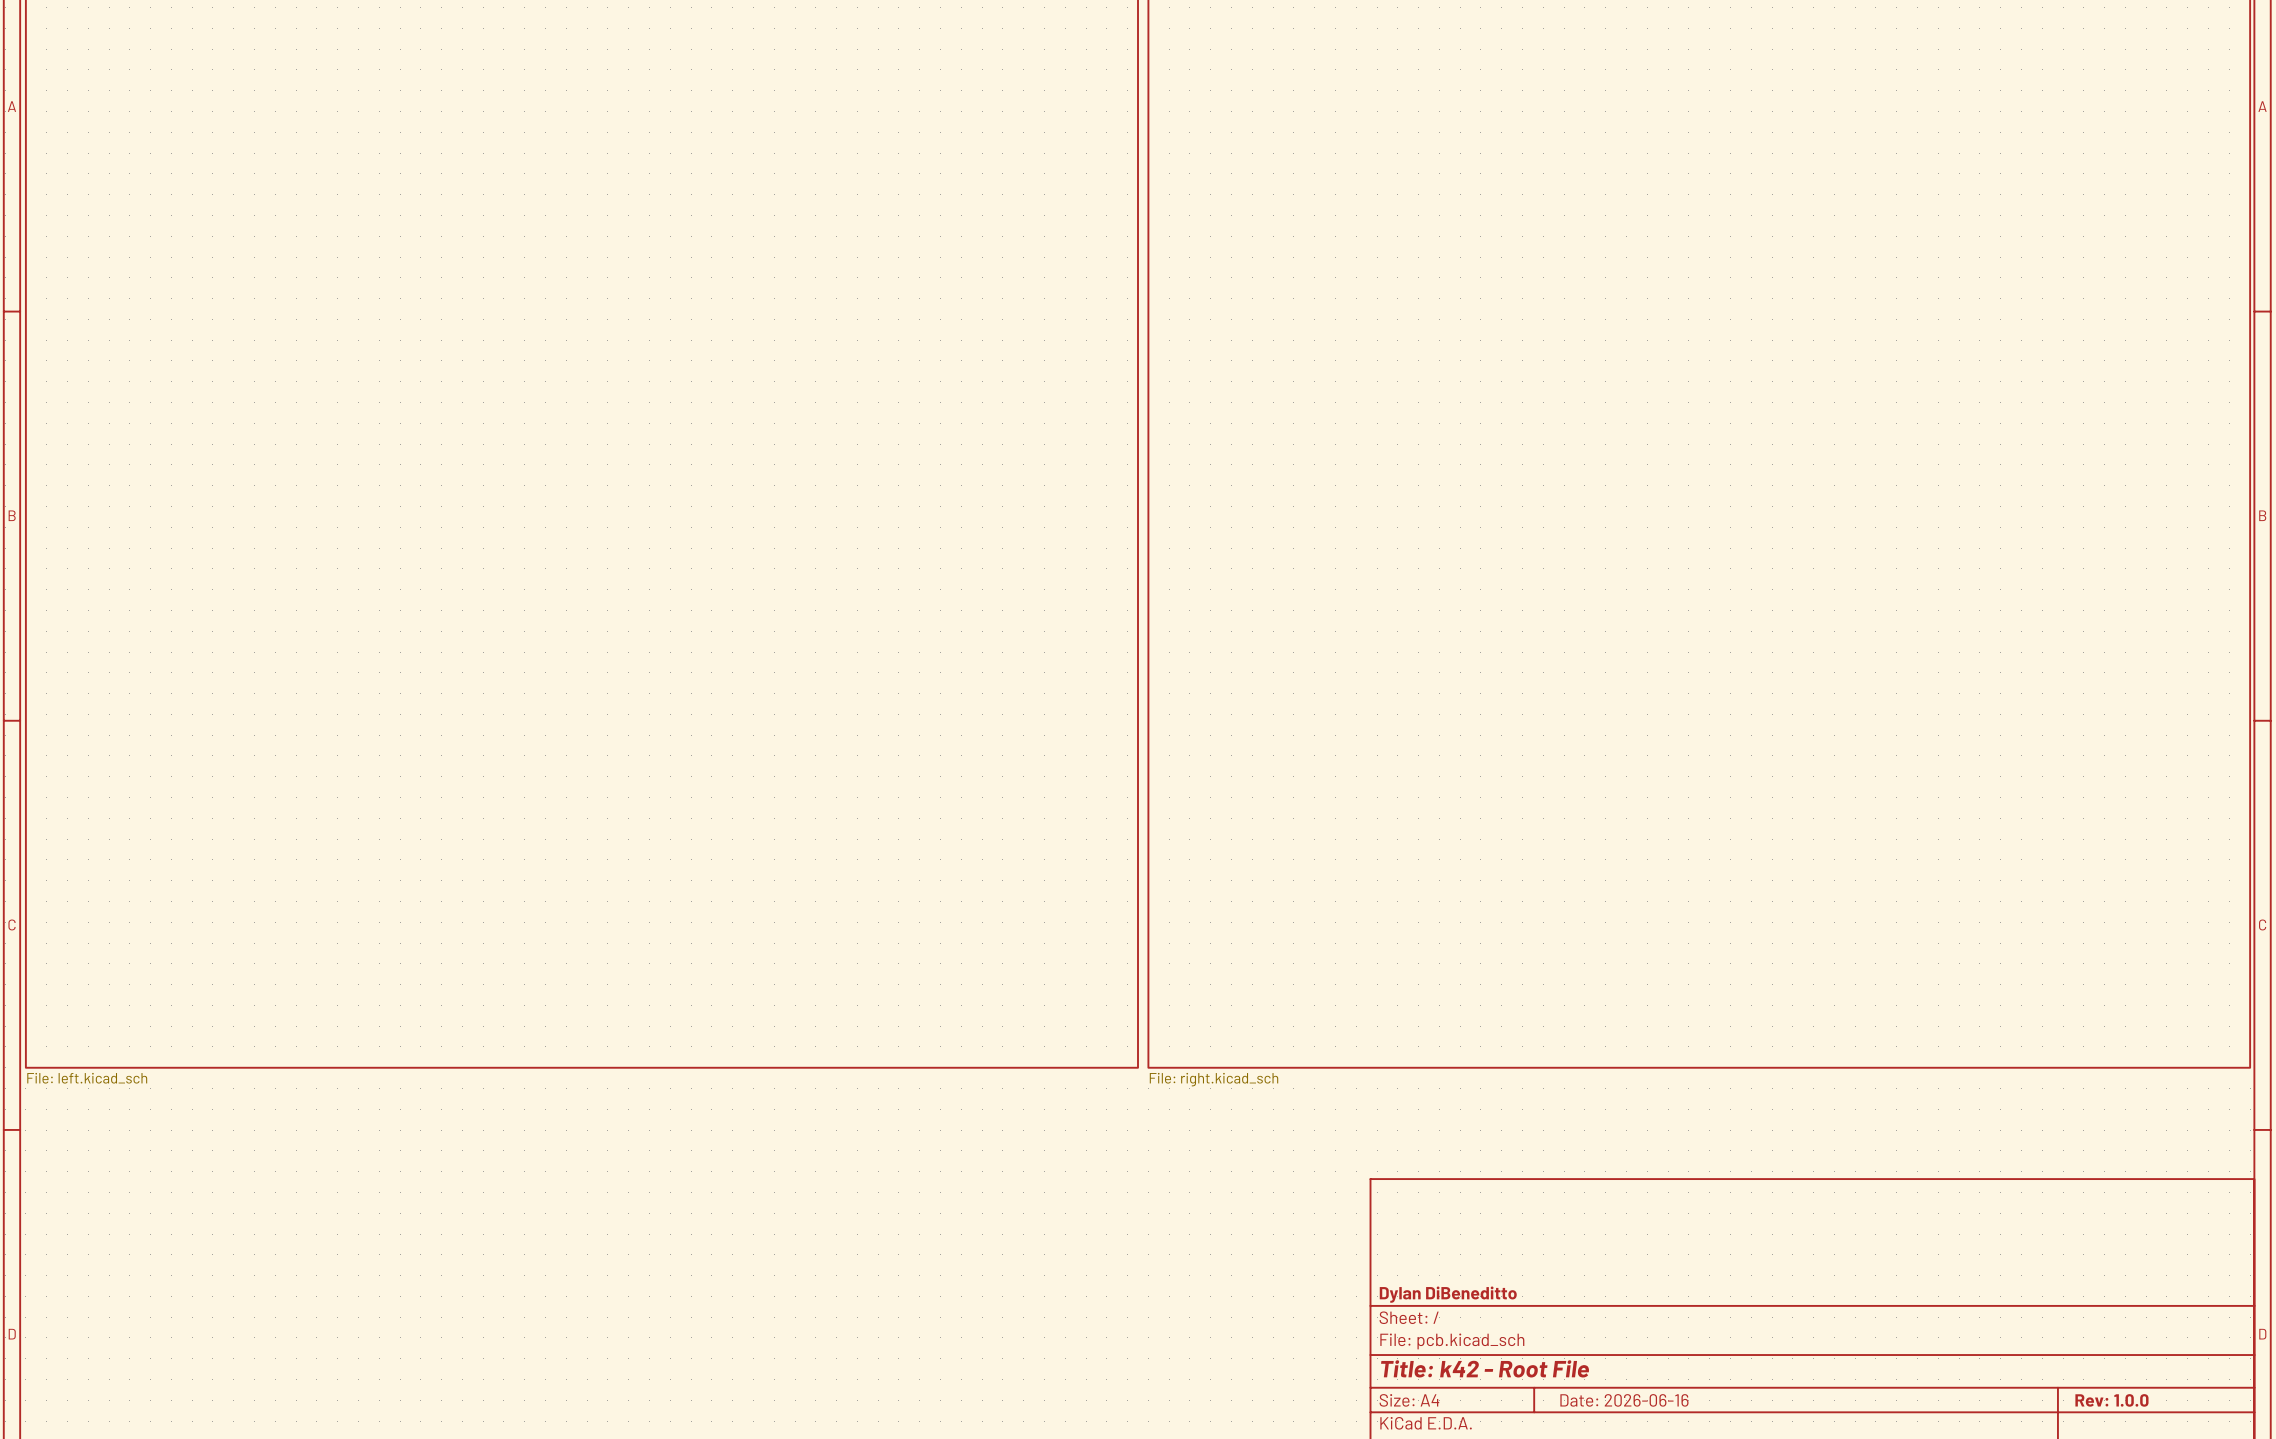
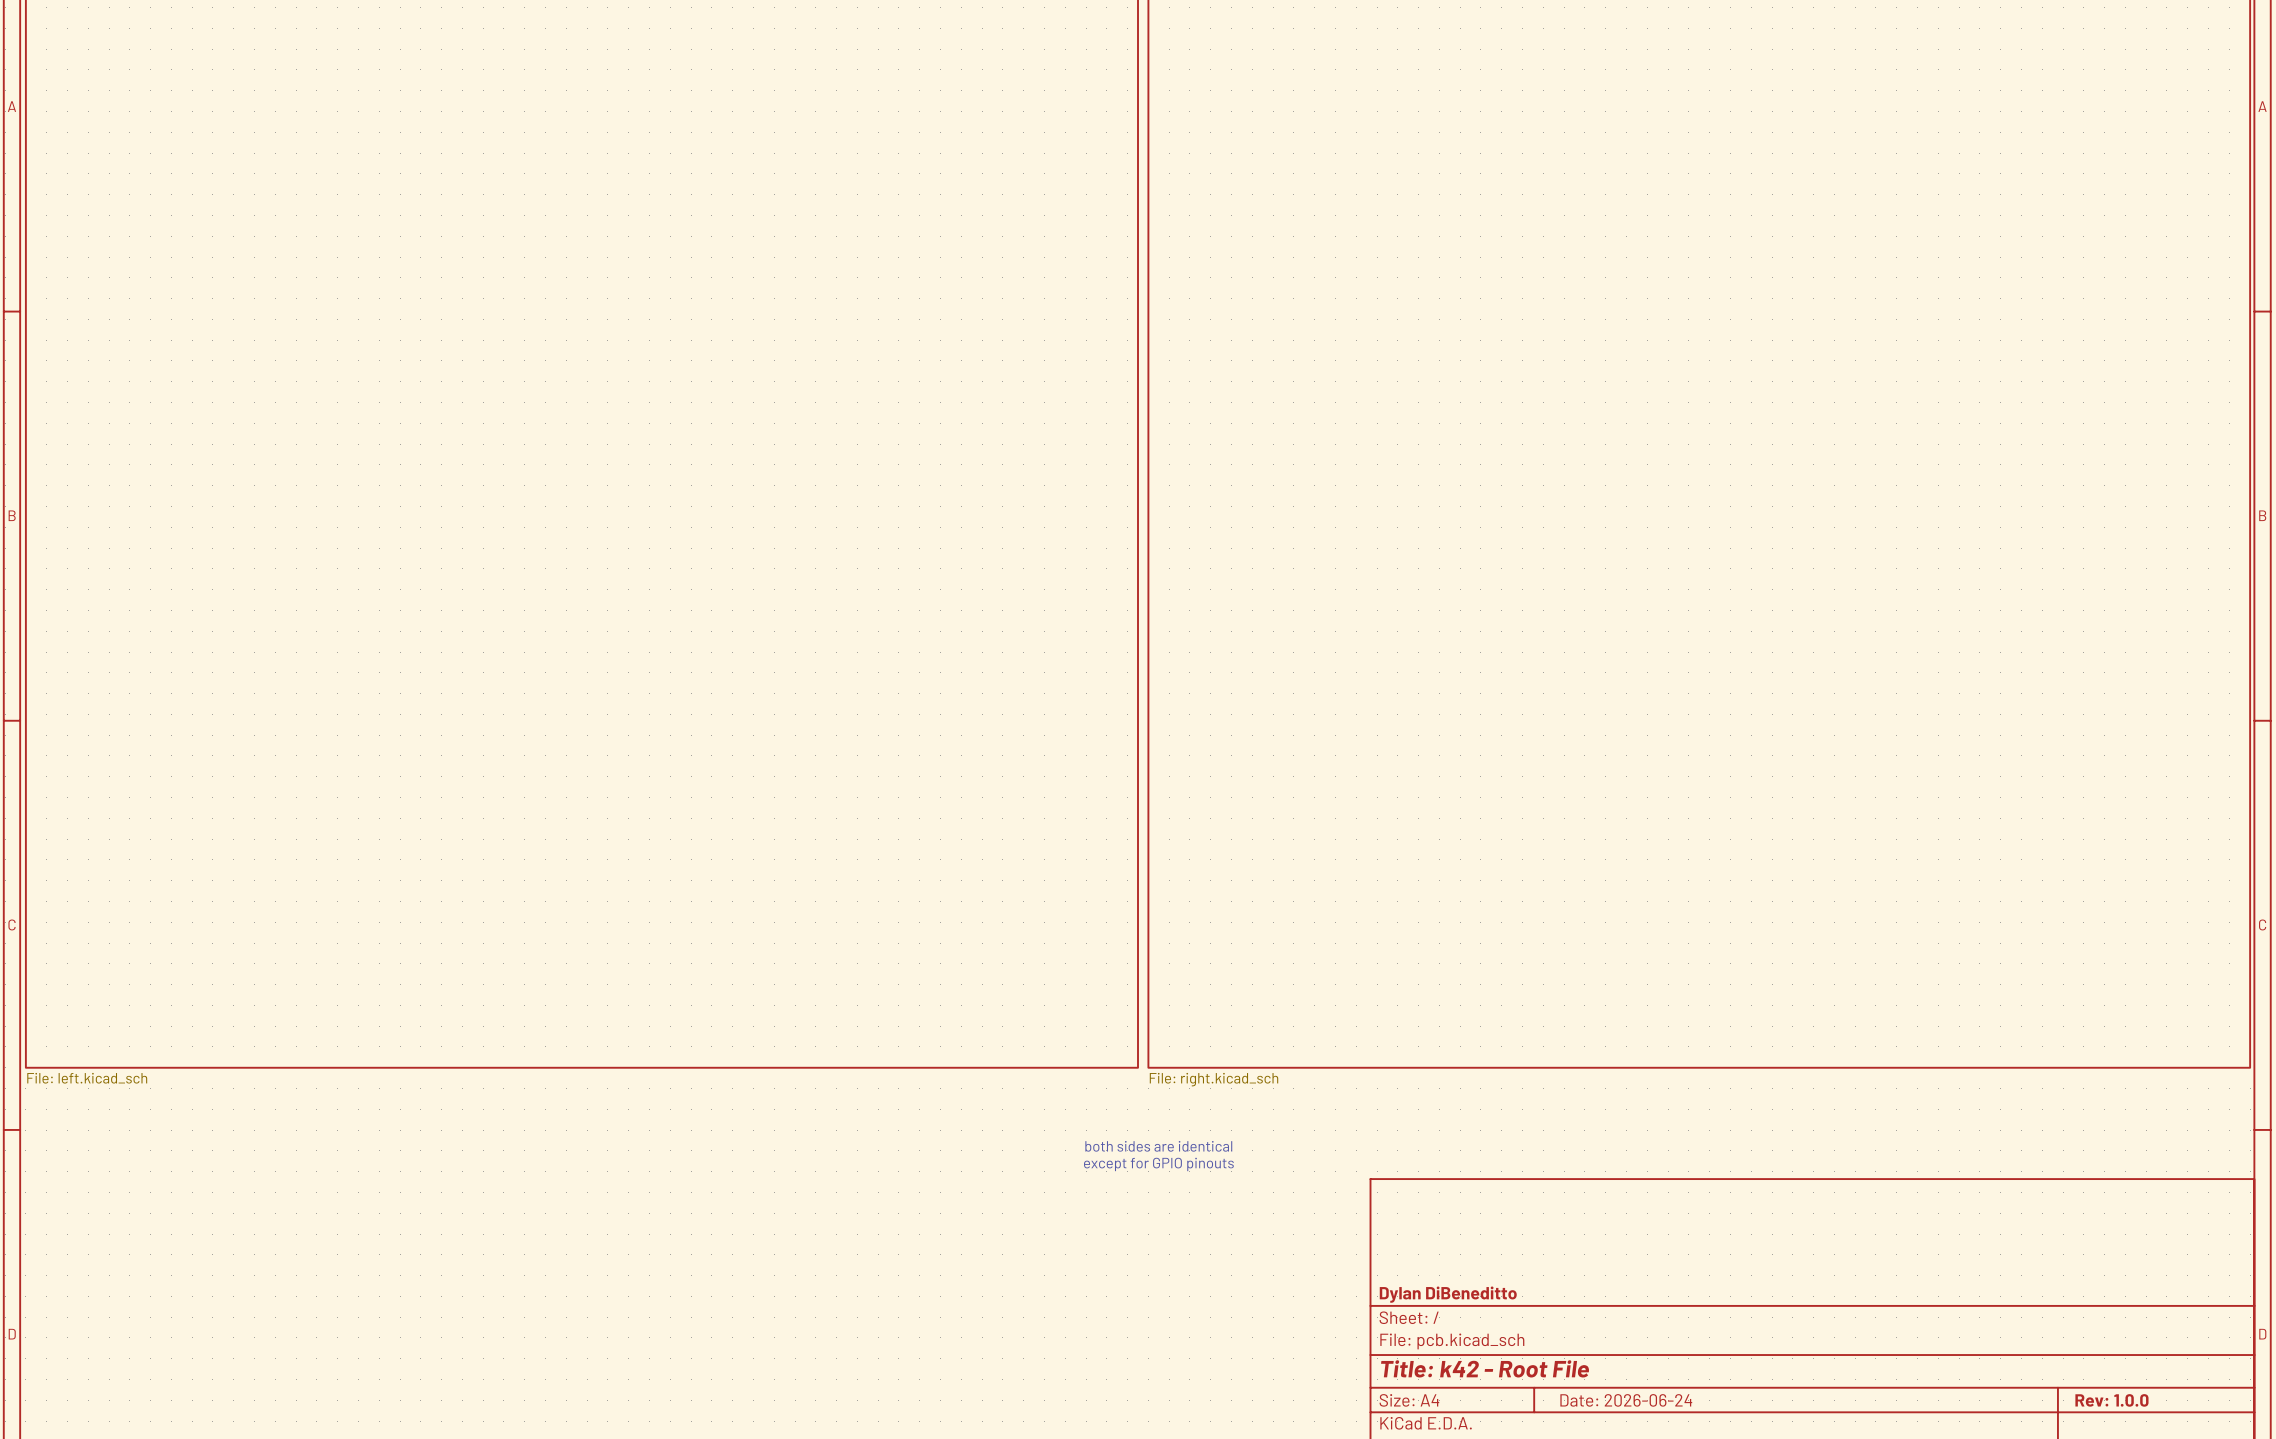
text: none -> both sides are identical (1158, 1146)
text: none -> except for GPIO pinouts (1158, 1164)
title block: Date: 2026-06-16 (1624, 1400) -> Date: 2026-06-24 (1626, 1400)

